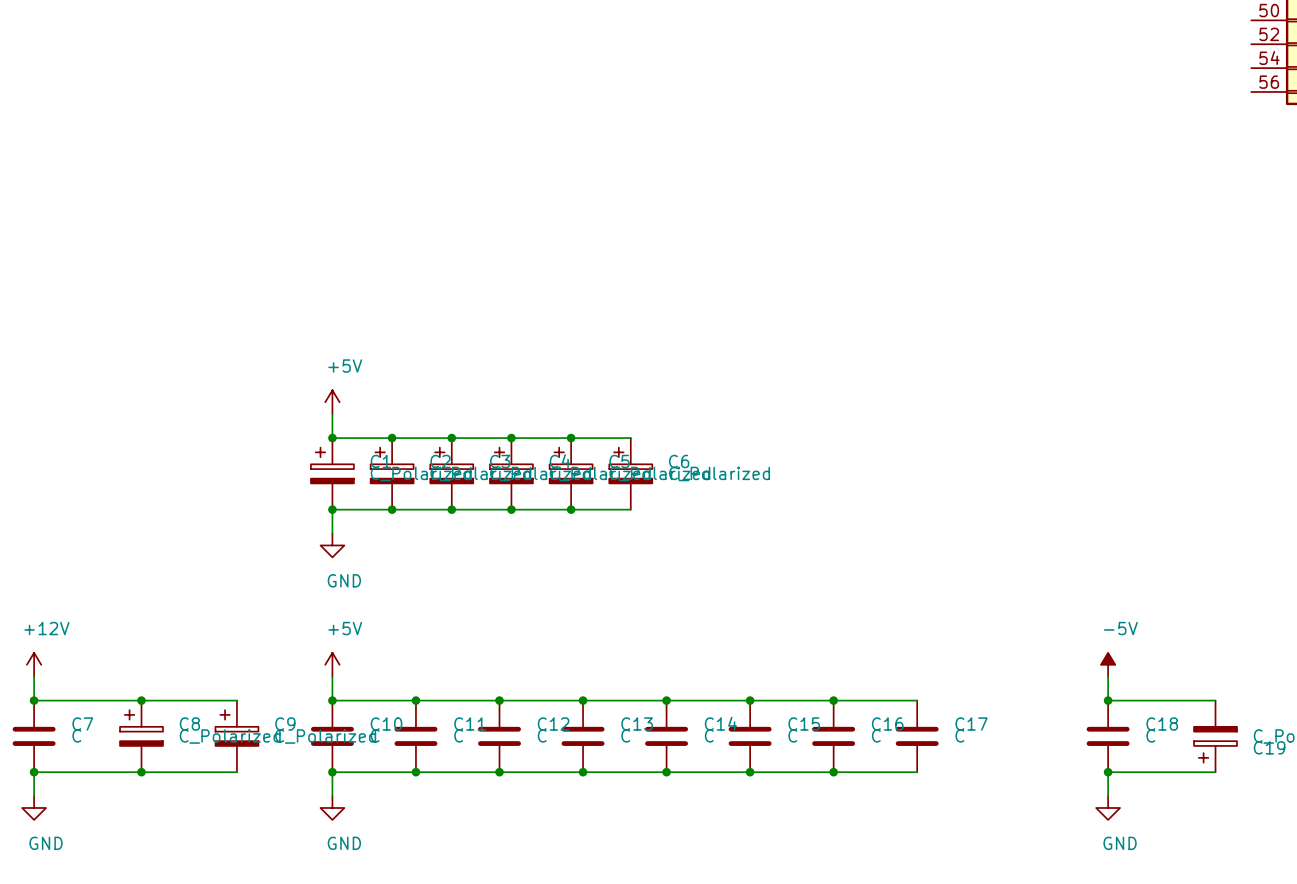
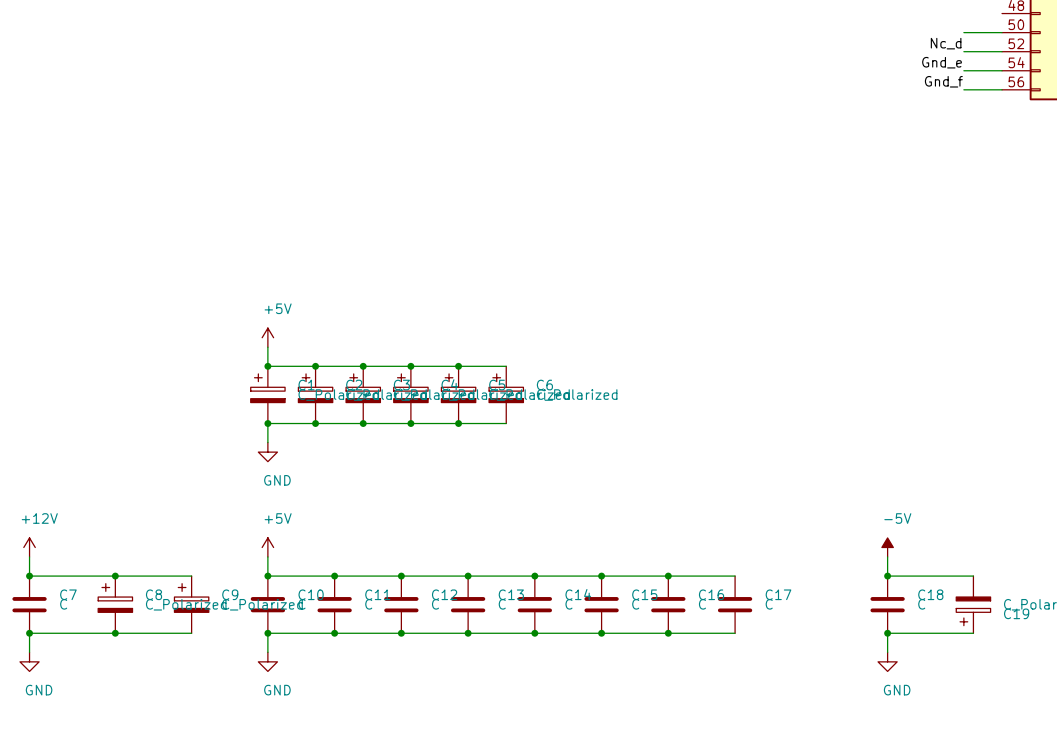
wire: none -> (963, 32) (1002, 32)
label: none -> Nc_d (946, 43)
wire: none -> (963, 51) (1002, 51)
label: none -> Gnd_e (942, 62)
wire: none -> (963, 70) (1002, 70)
label: none -> Gnd_f (943, 81)
wire: none -> (963, 89) (1002, 89)

